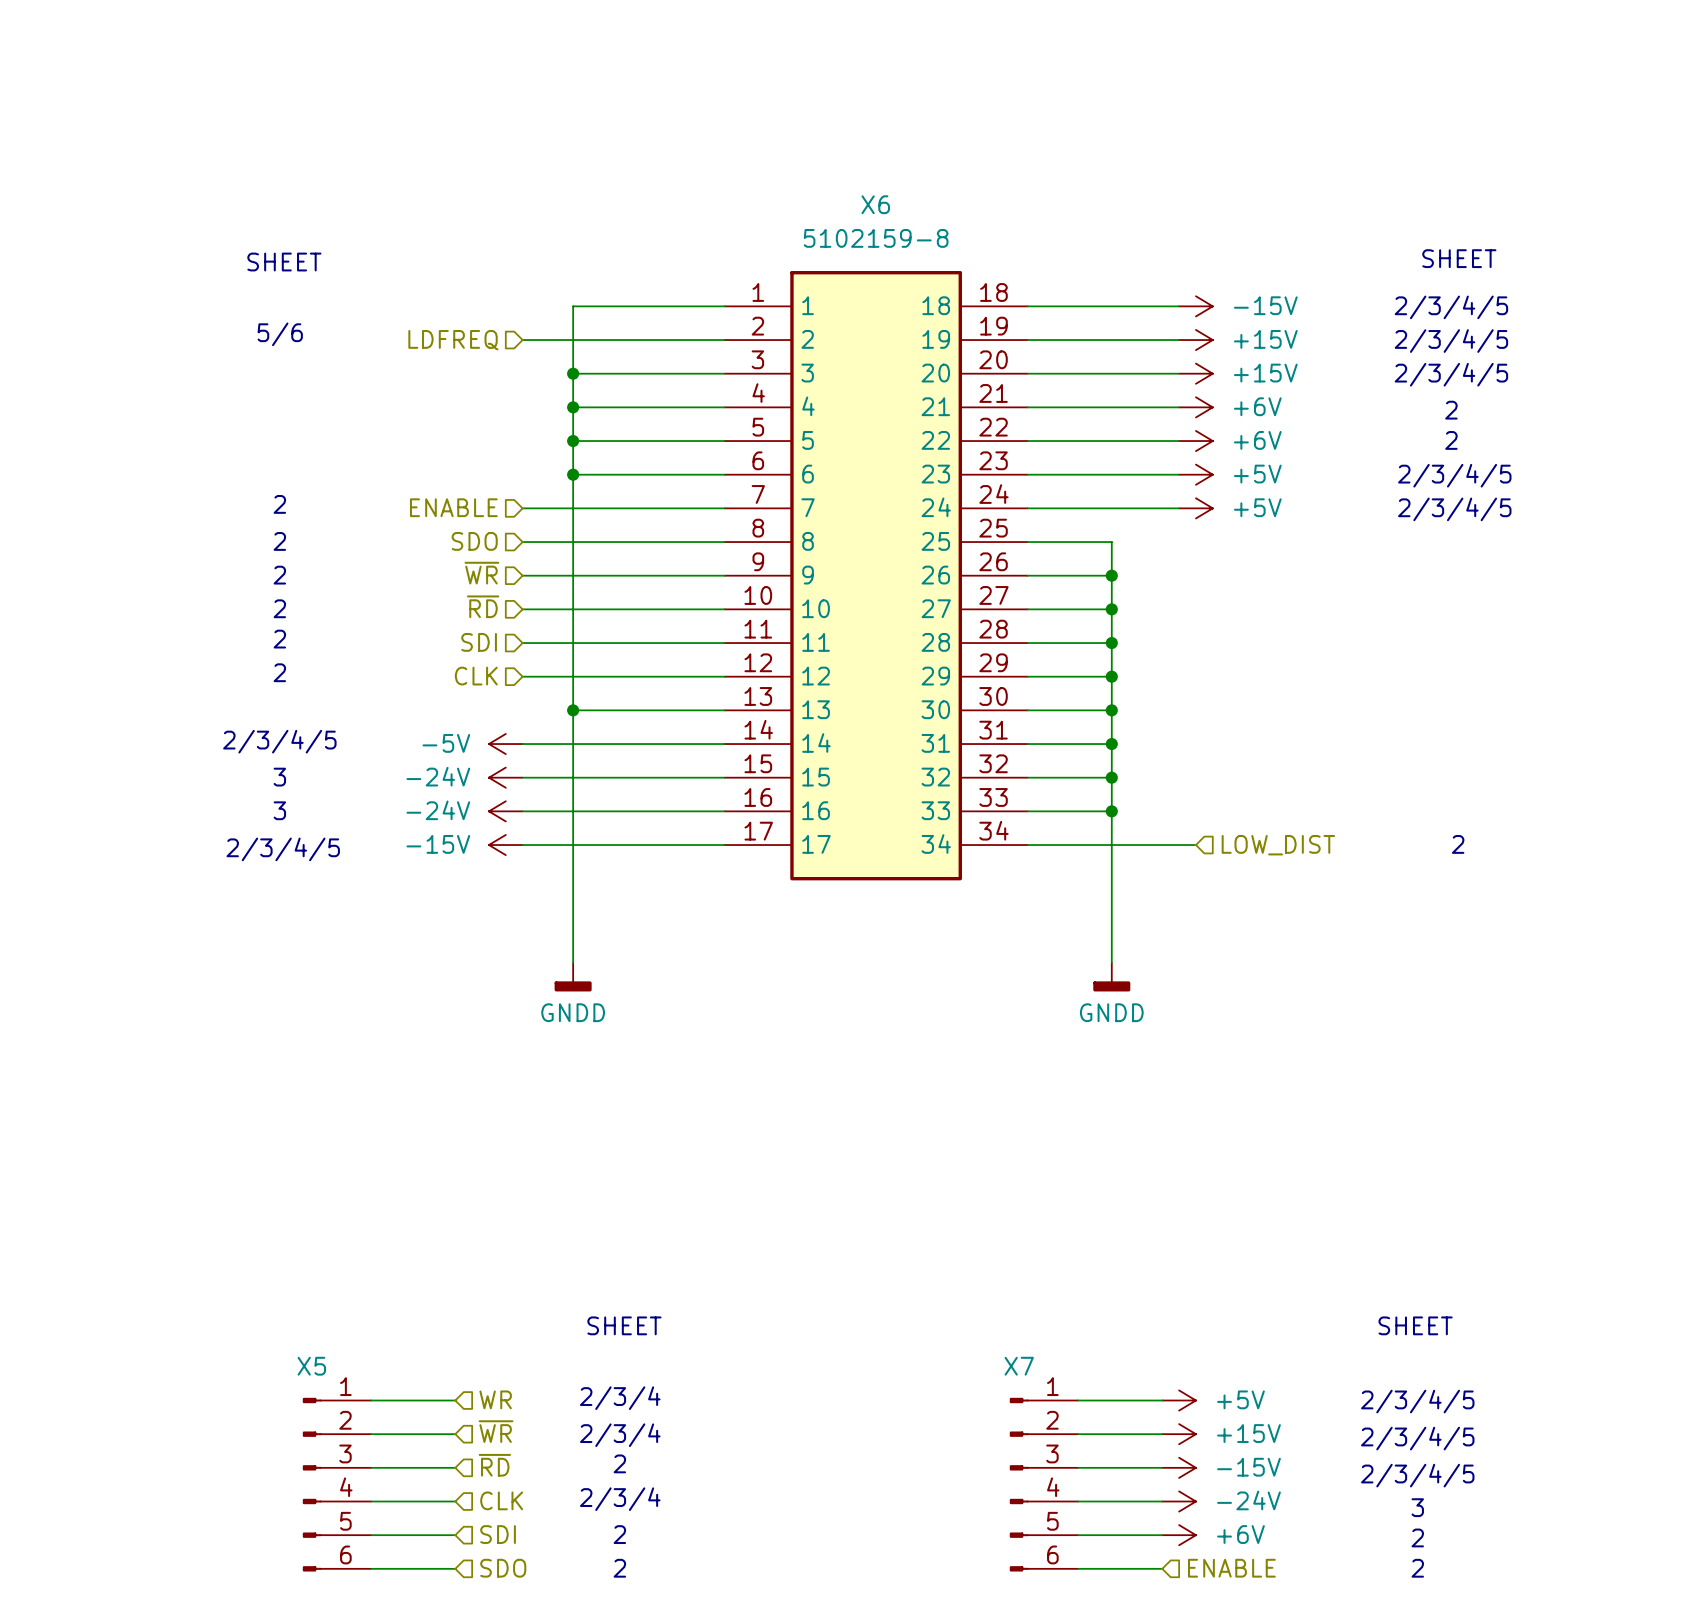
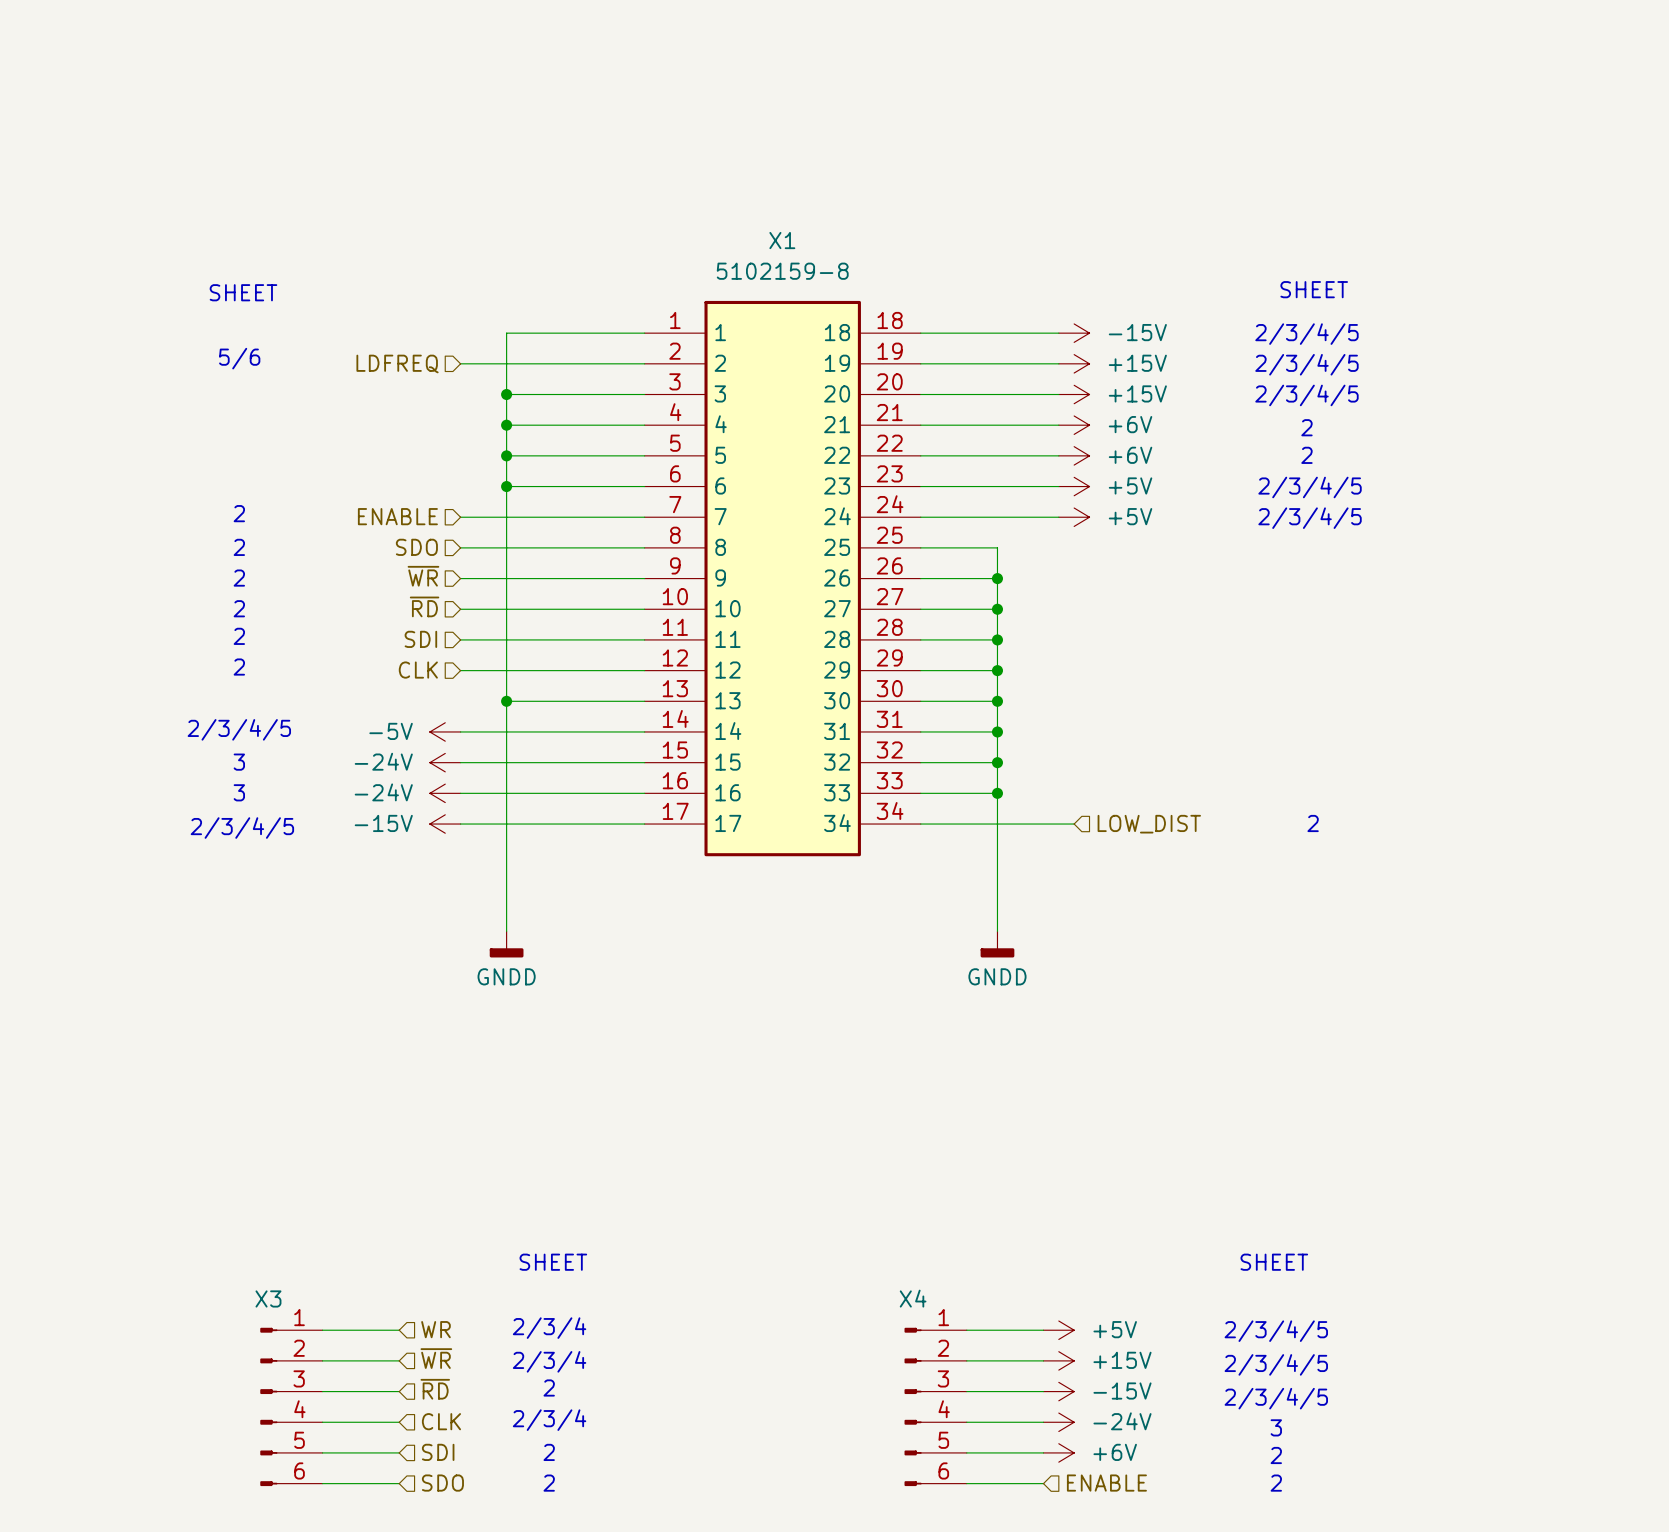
X6 name: X6 (875, 204) -> X1 (782, 240)
X5 name: X5 (311, 1366) -> X3 (268, 1298)
X7 name: X7 (1019, 1366) -> X4 (913, 1298)

